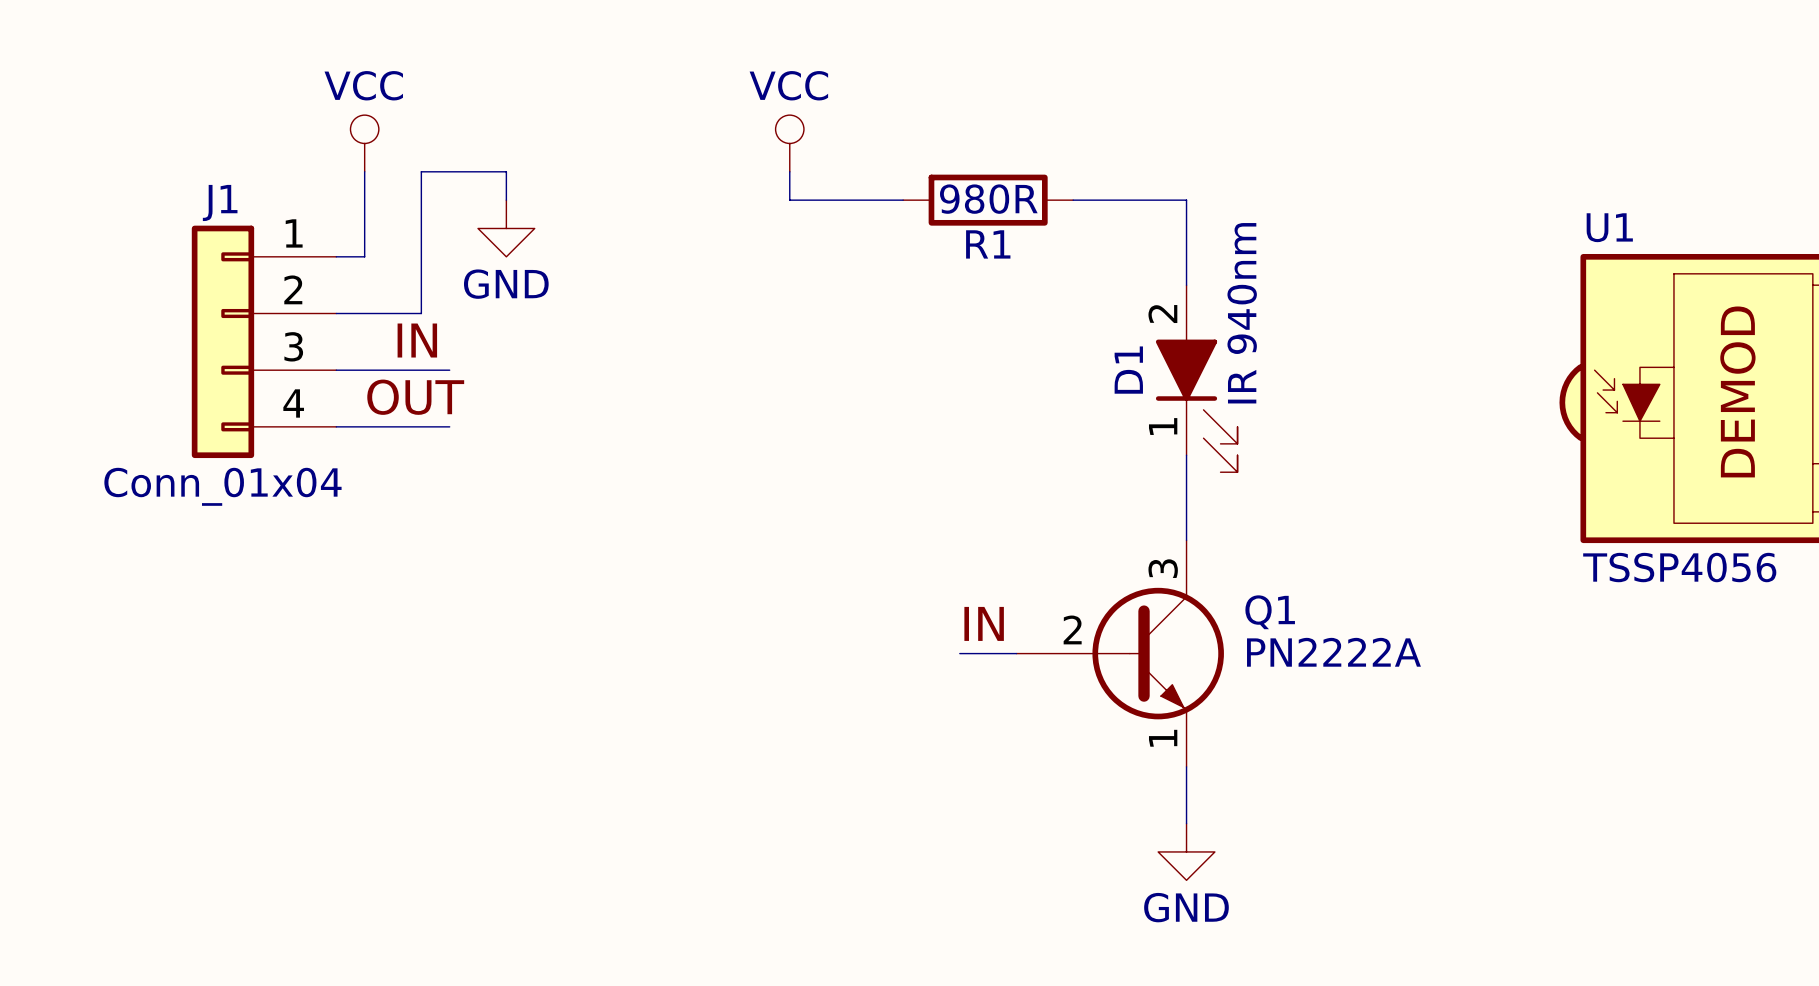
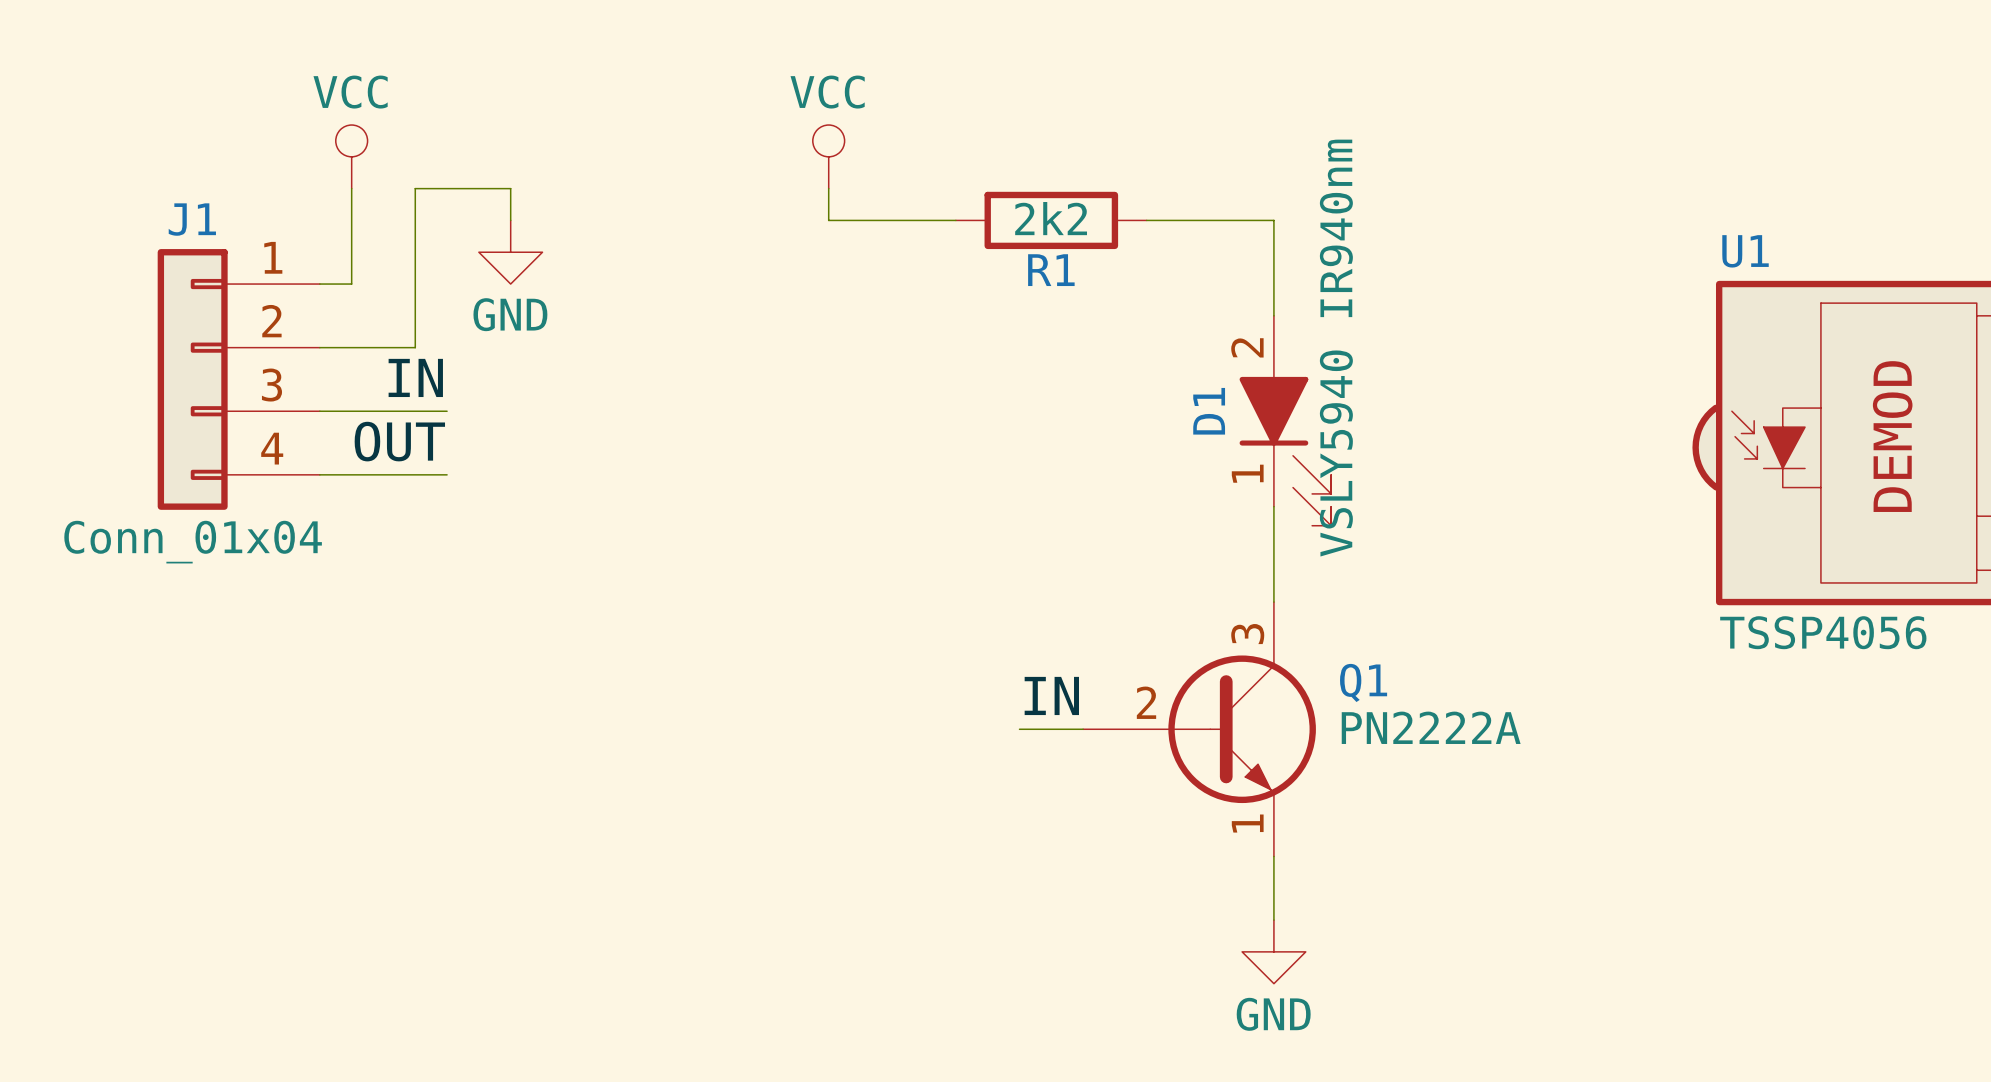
R1 value: 980R (988, 199) -> 2k2 (1051, 218)
D1 value: IR 940nm (1242, 313) -> VSLY5940 IR940nm (1336, 348)

